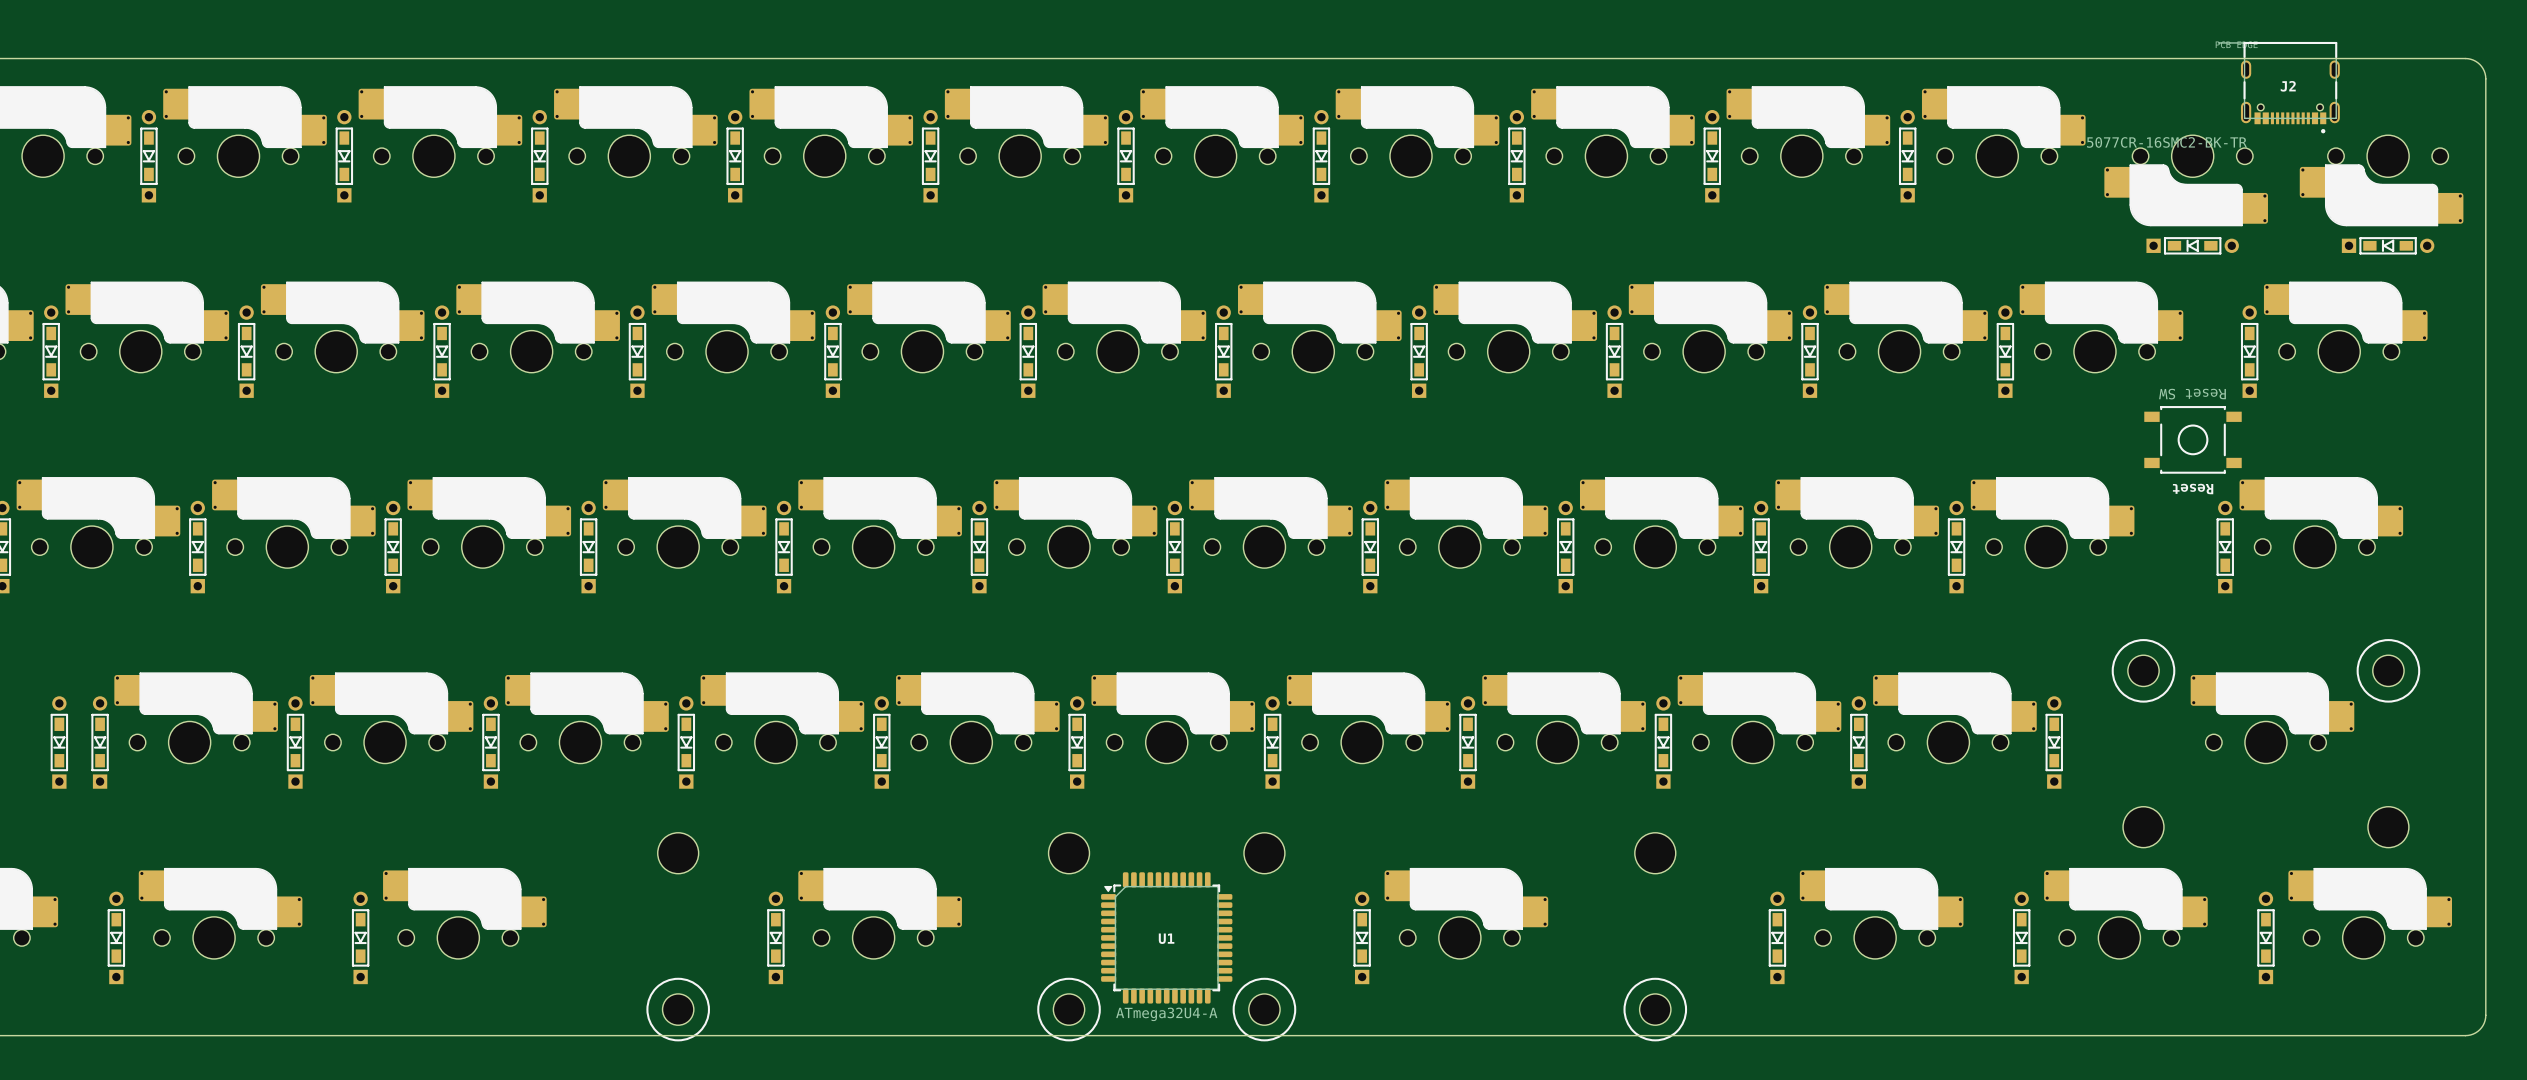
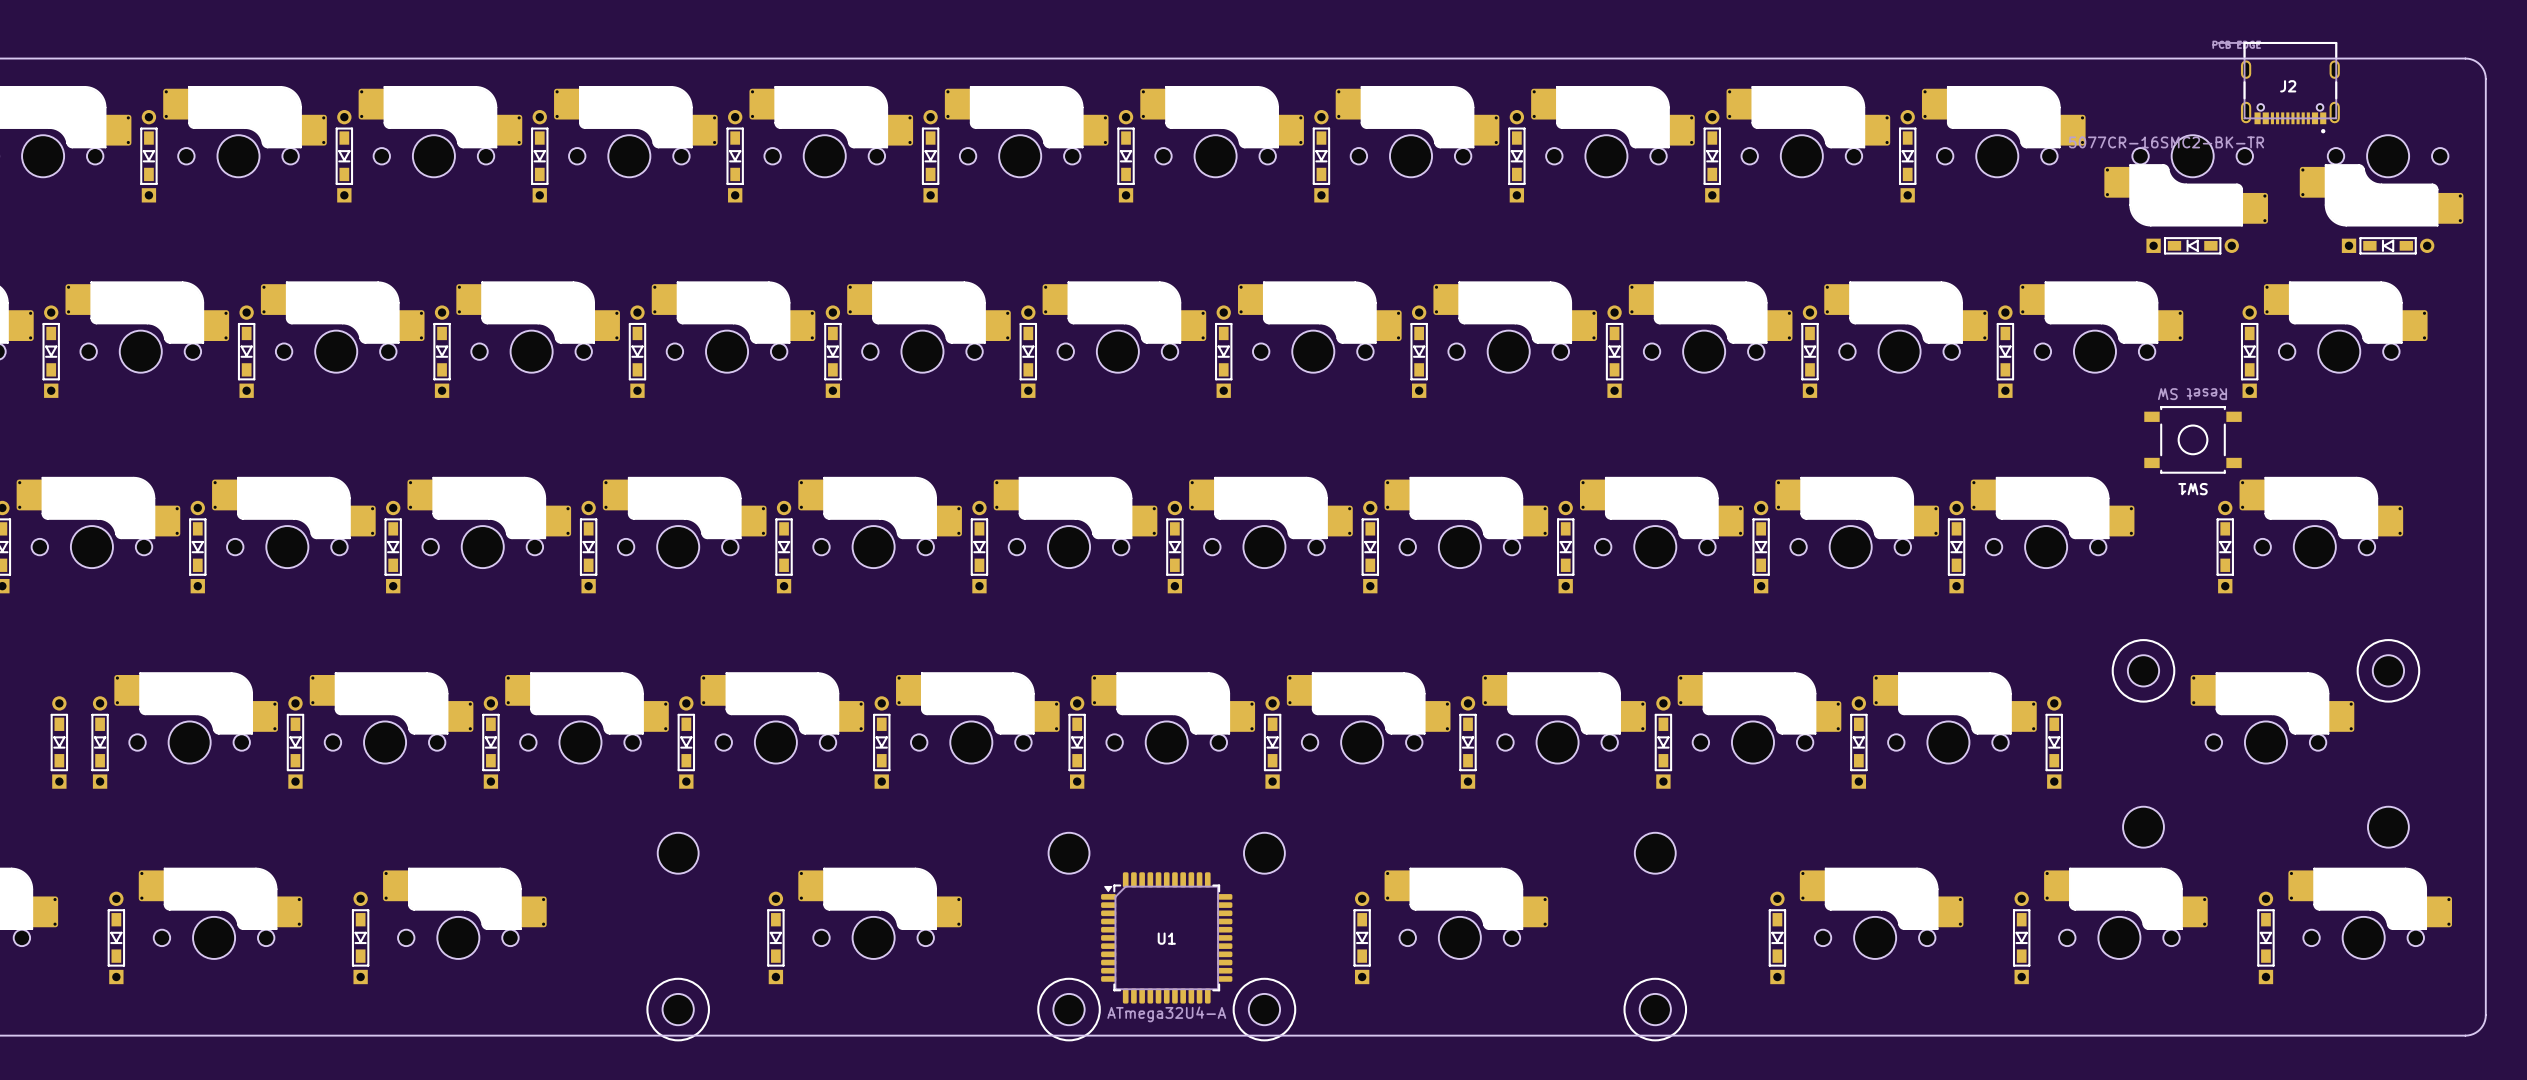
Reset name: Reset (2193, 489) -> SW1 (2193, 489)

